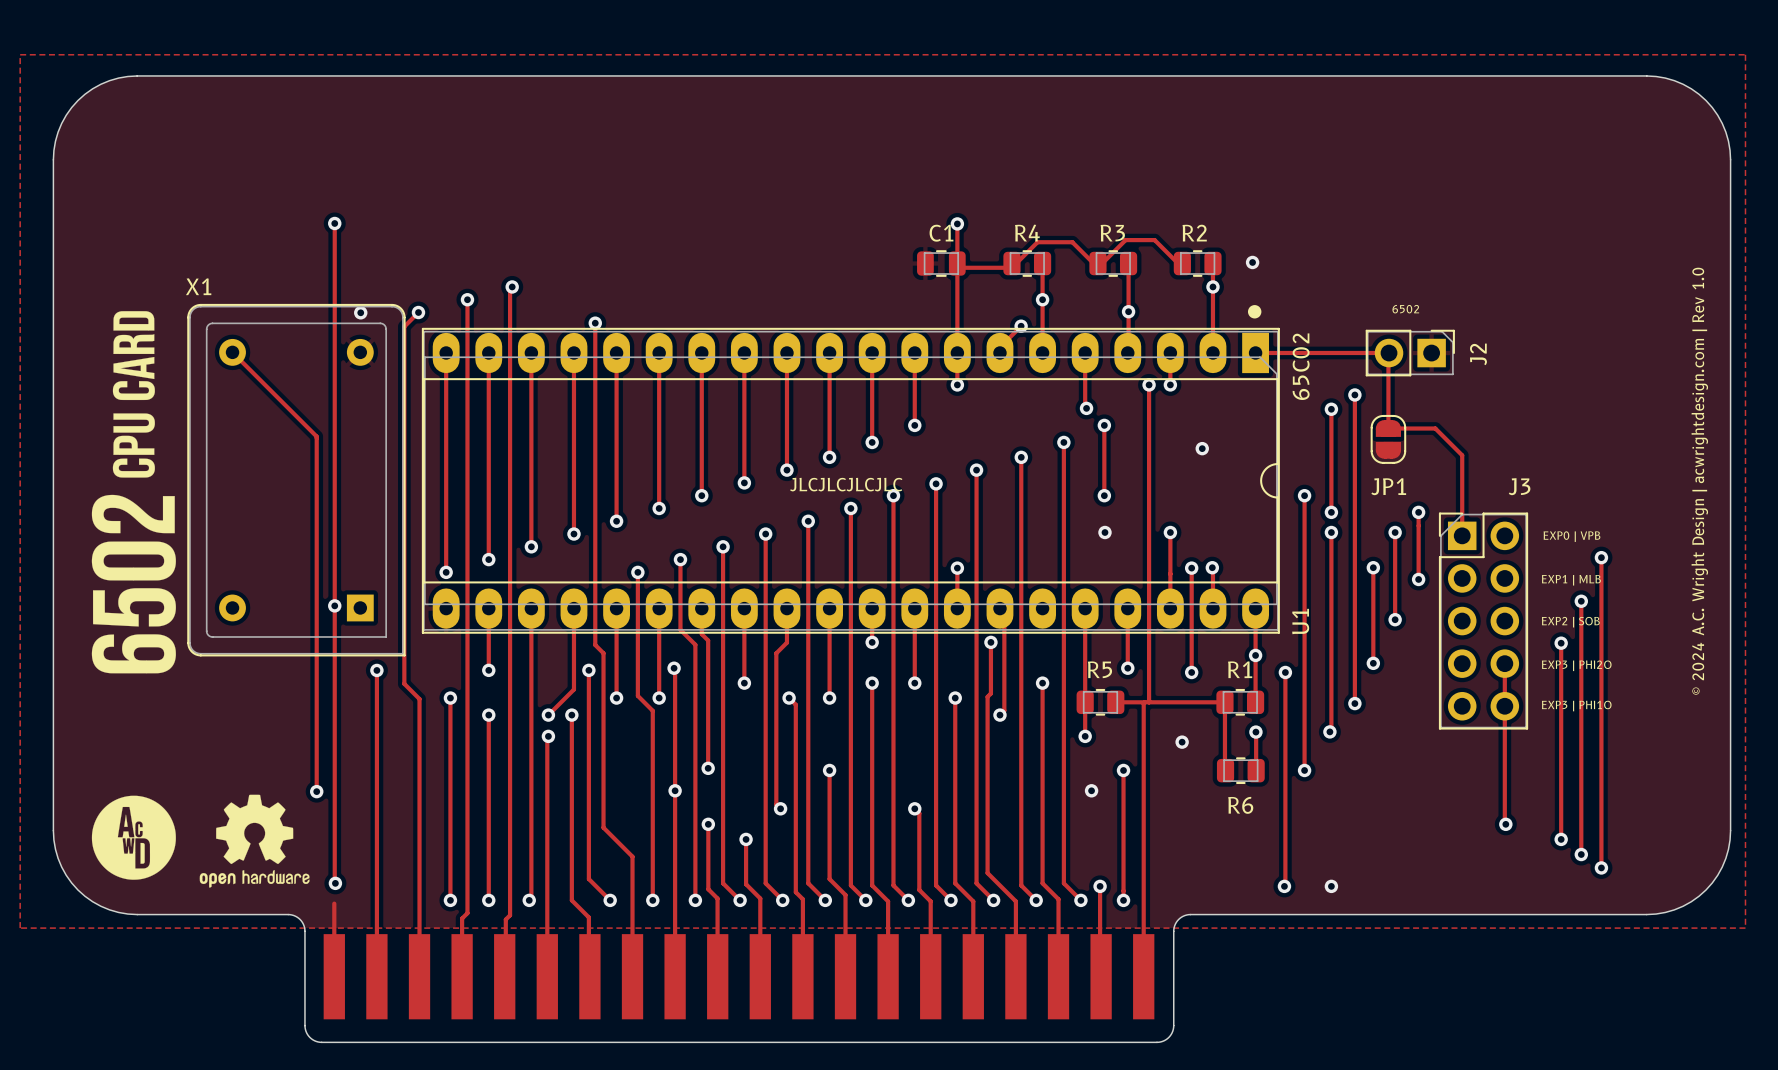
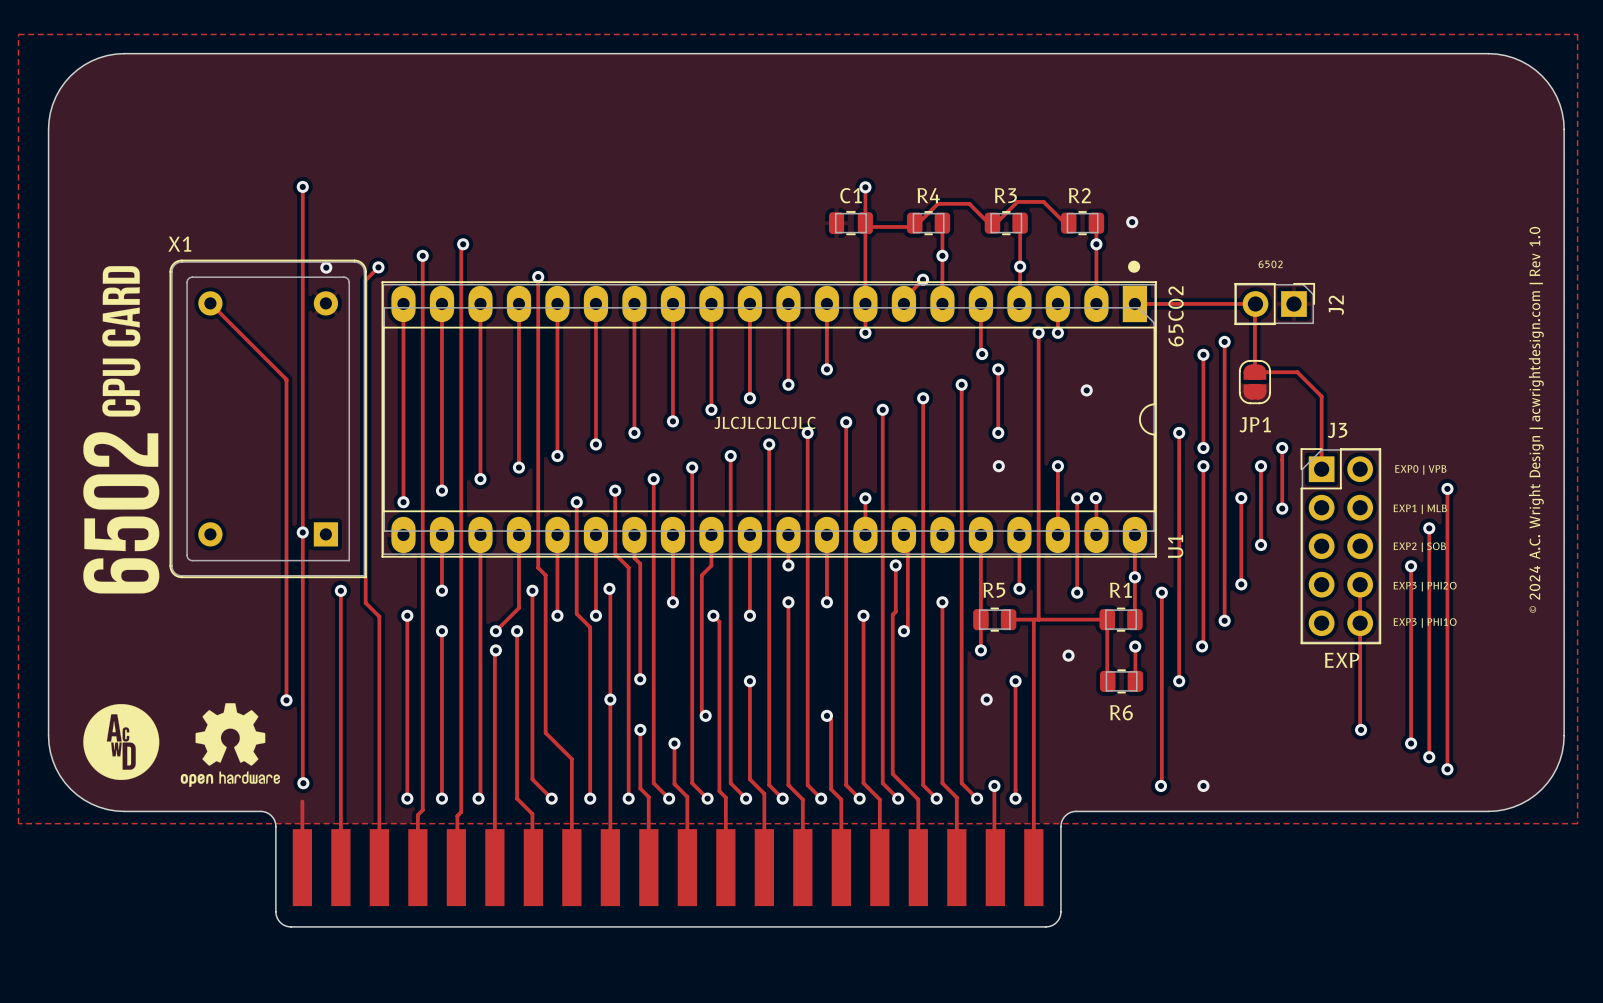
J3 name position: J3 (1519, 486) -> J3 (1337, 430)
J3 value: none -> EXP (1342, 660)

